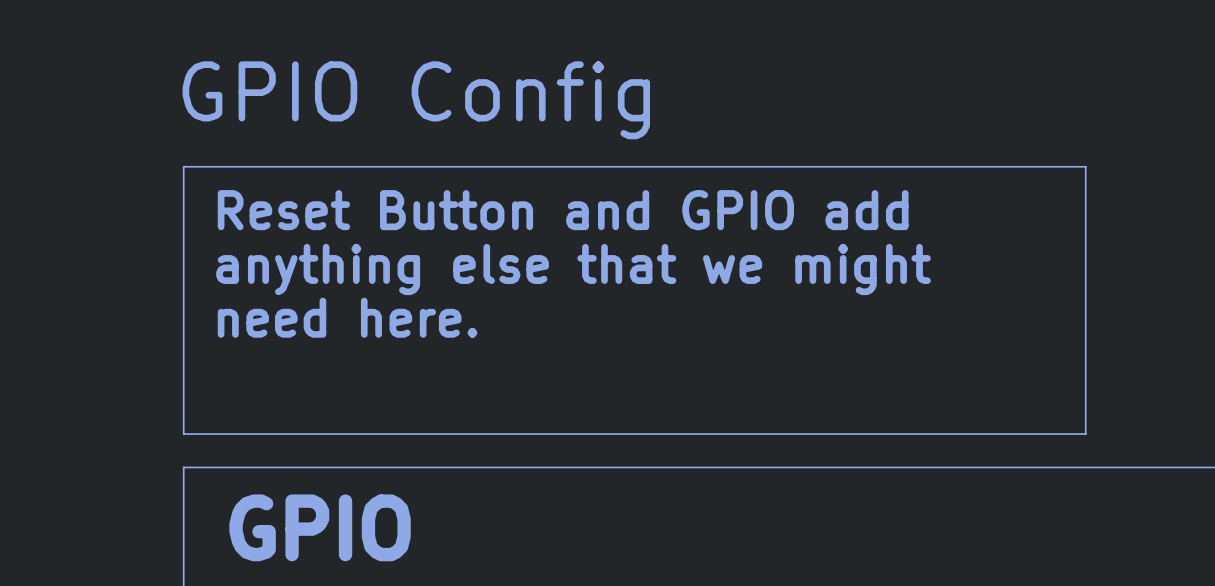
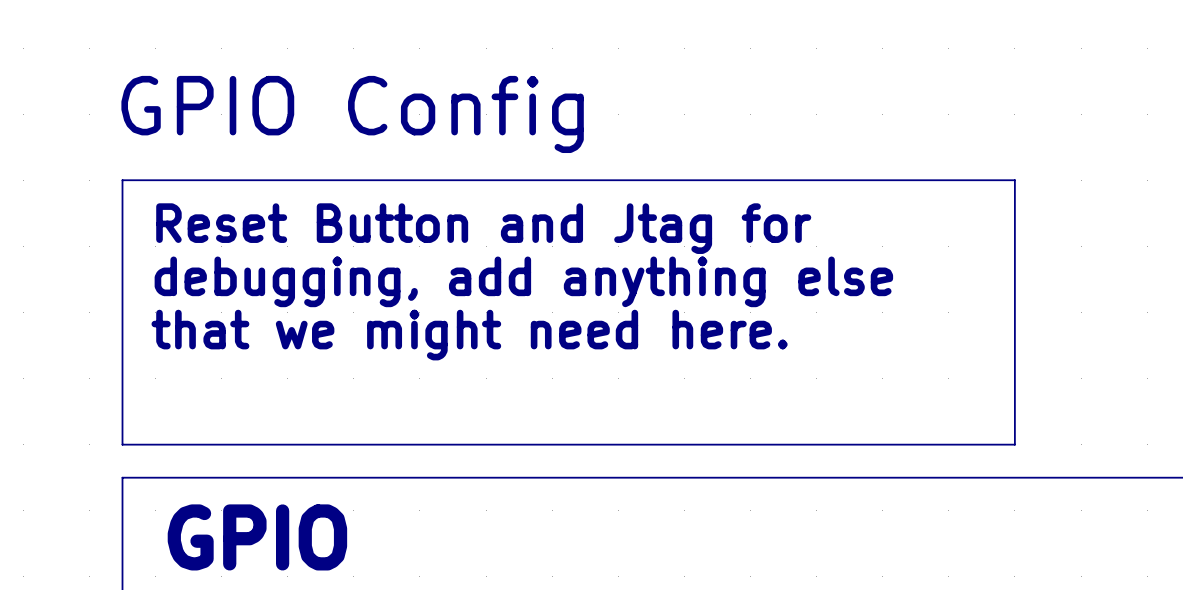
text: Reset Button and GPIO add (563, 210) -> Reset Button and Jtag for (483, 228)
text: anything else that we might (573, 269) -> debugging, add anything else (523, 281)
text: need here. (347, 317) -> that we might need here. (469, 335)

